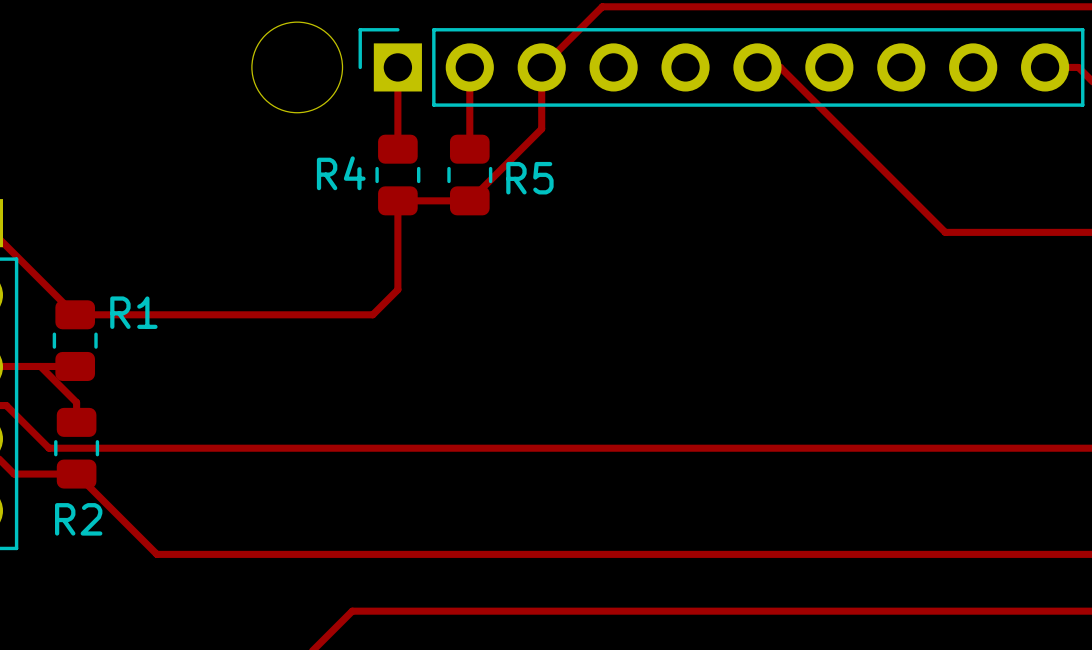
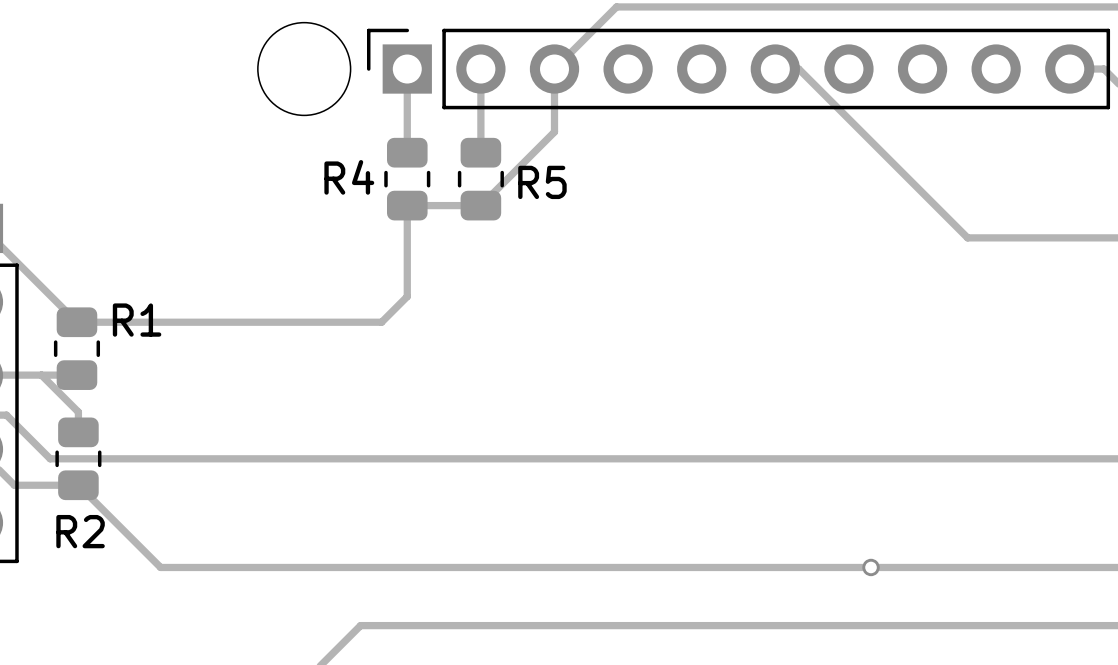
via: none -> (871, 567)

